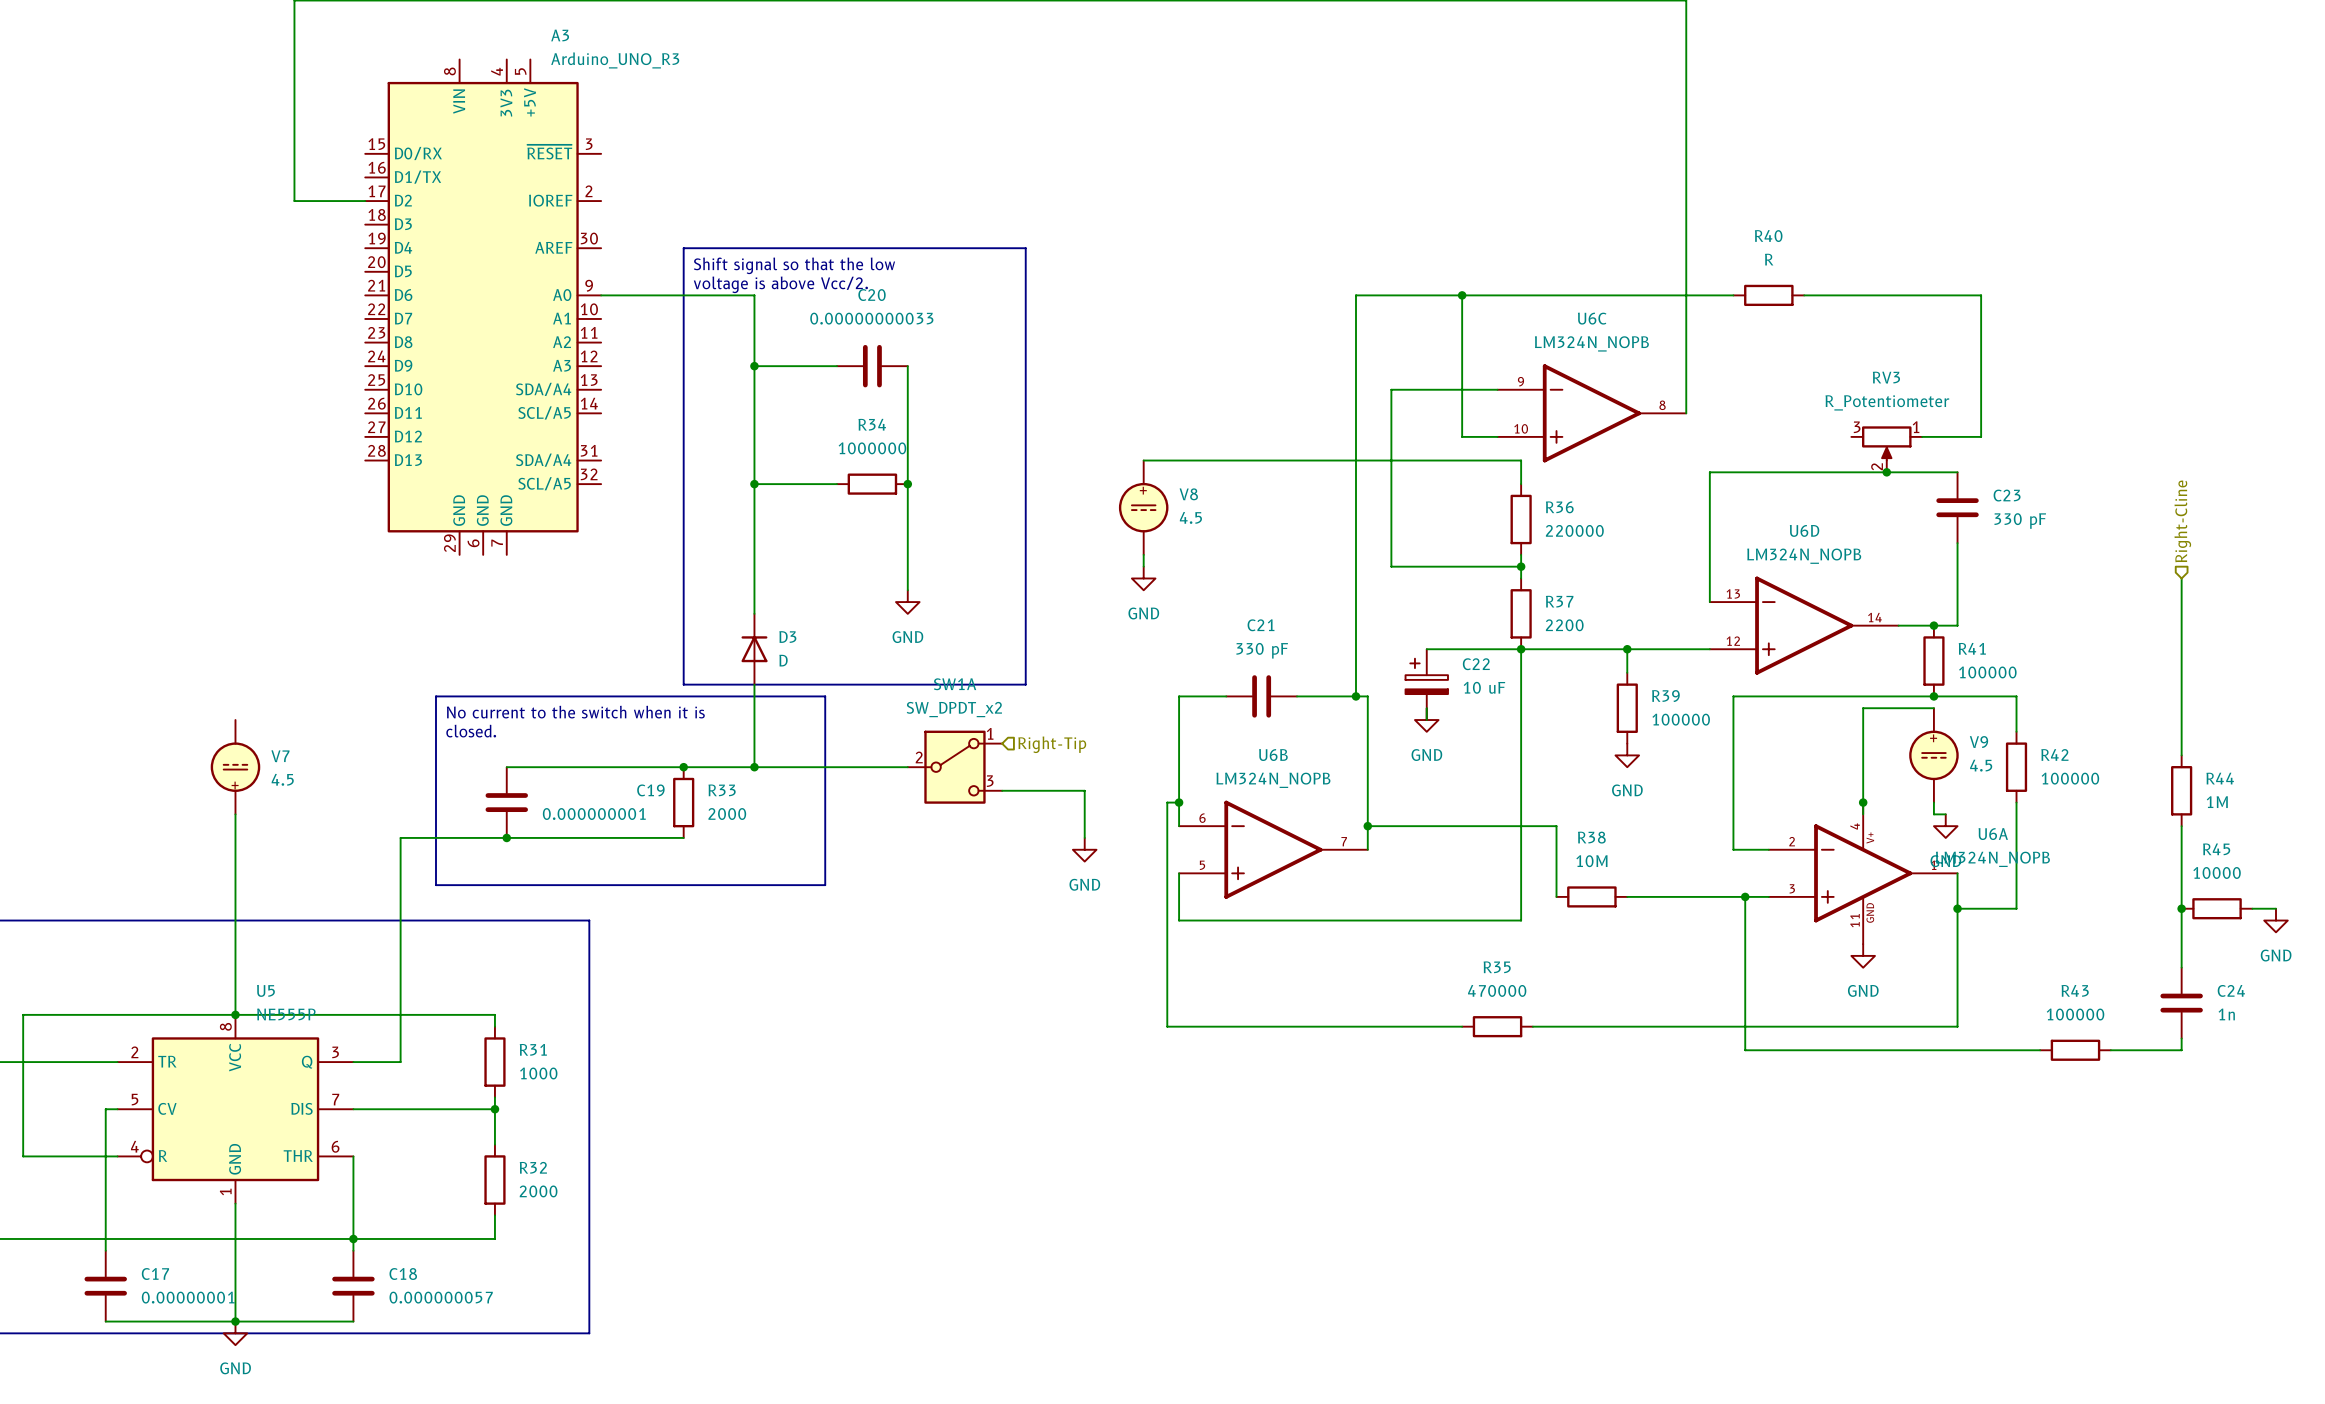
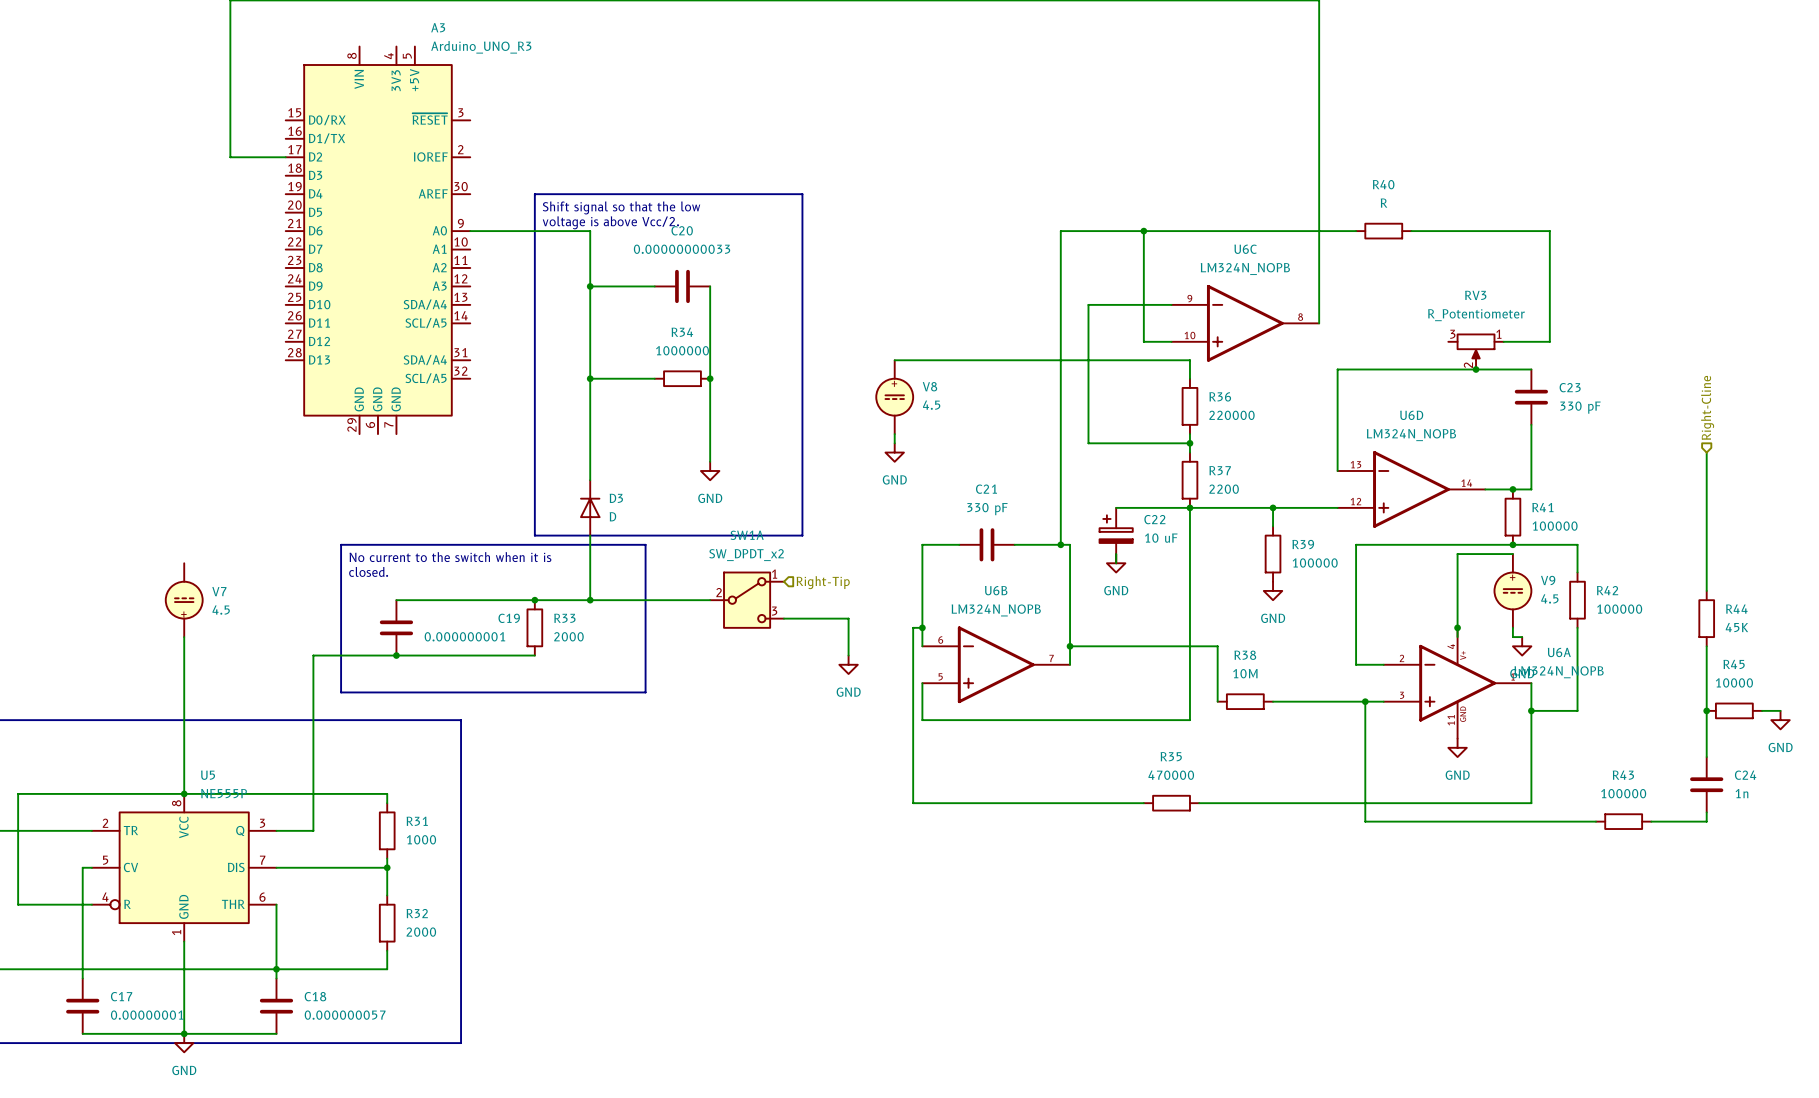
R44 value: 1M (2217, 802) -> 45K (1736, 627)

